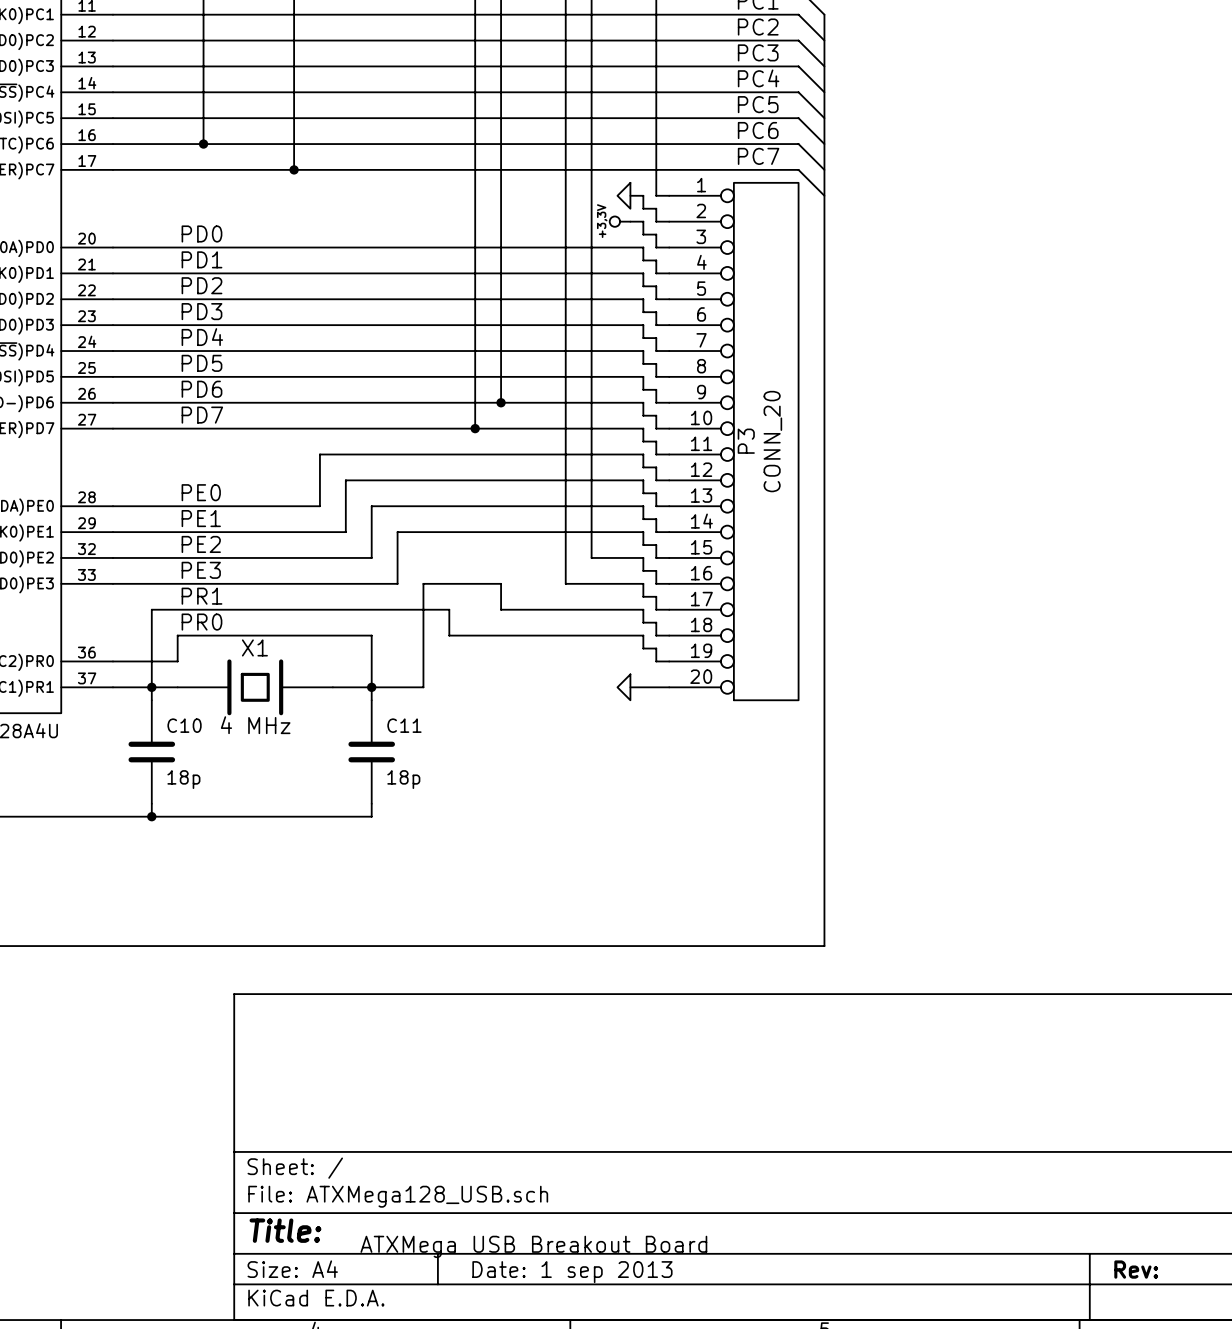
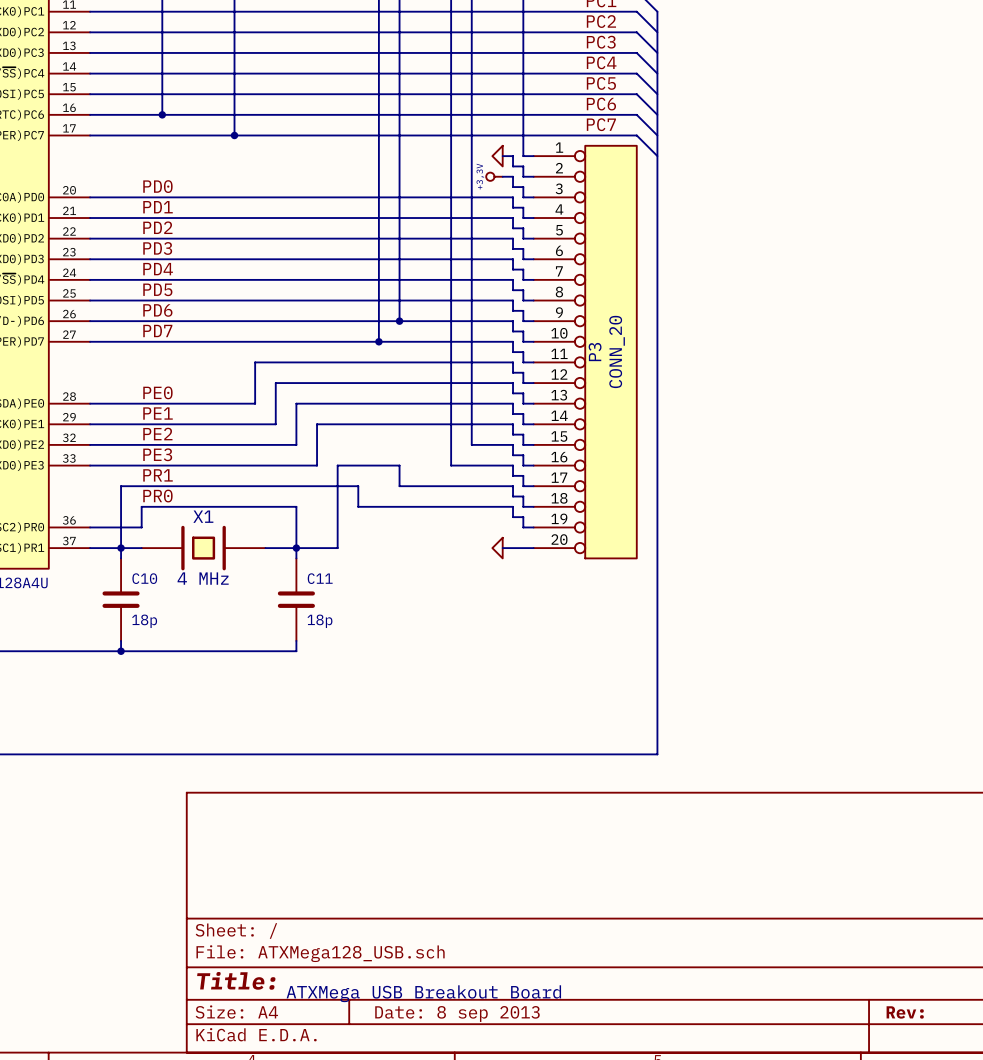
title block: Date: 1 sep 2013 (572, 1272) -> Date: 8 sep 2013 (457, 1013)

